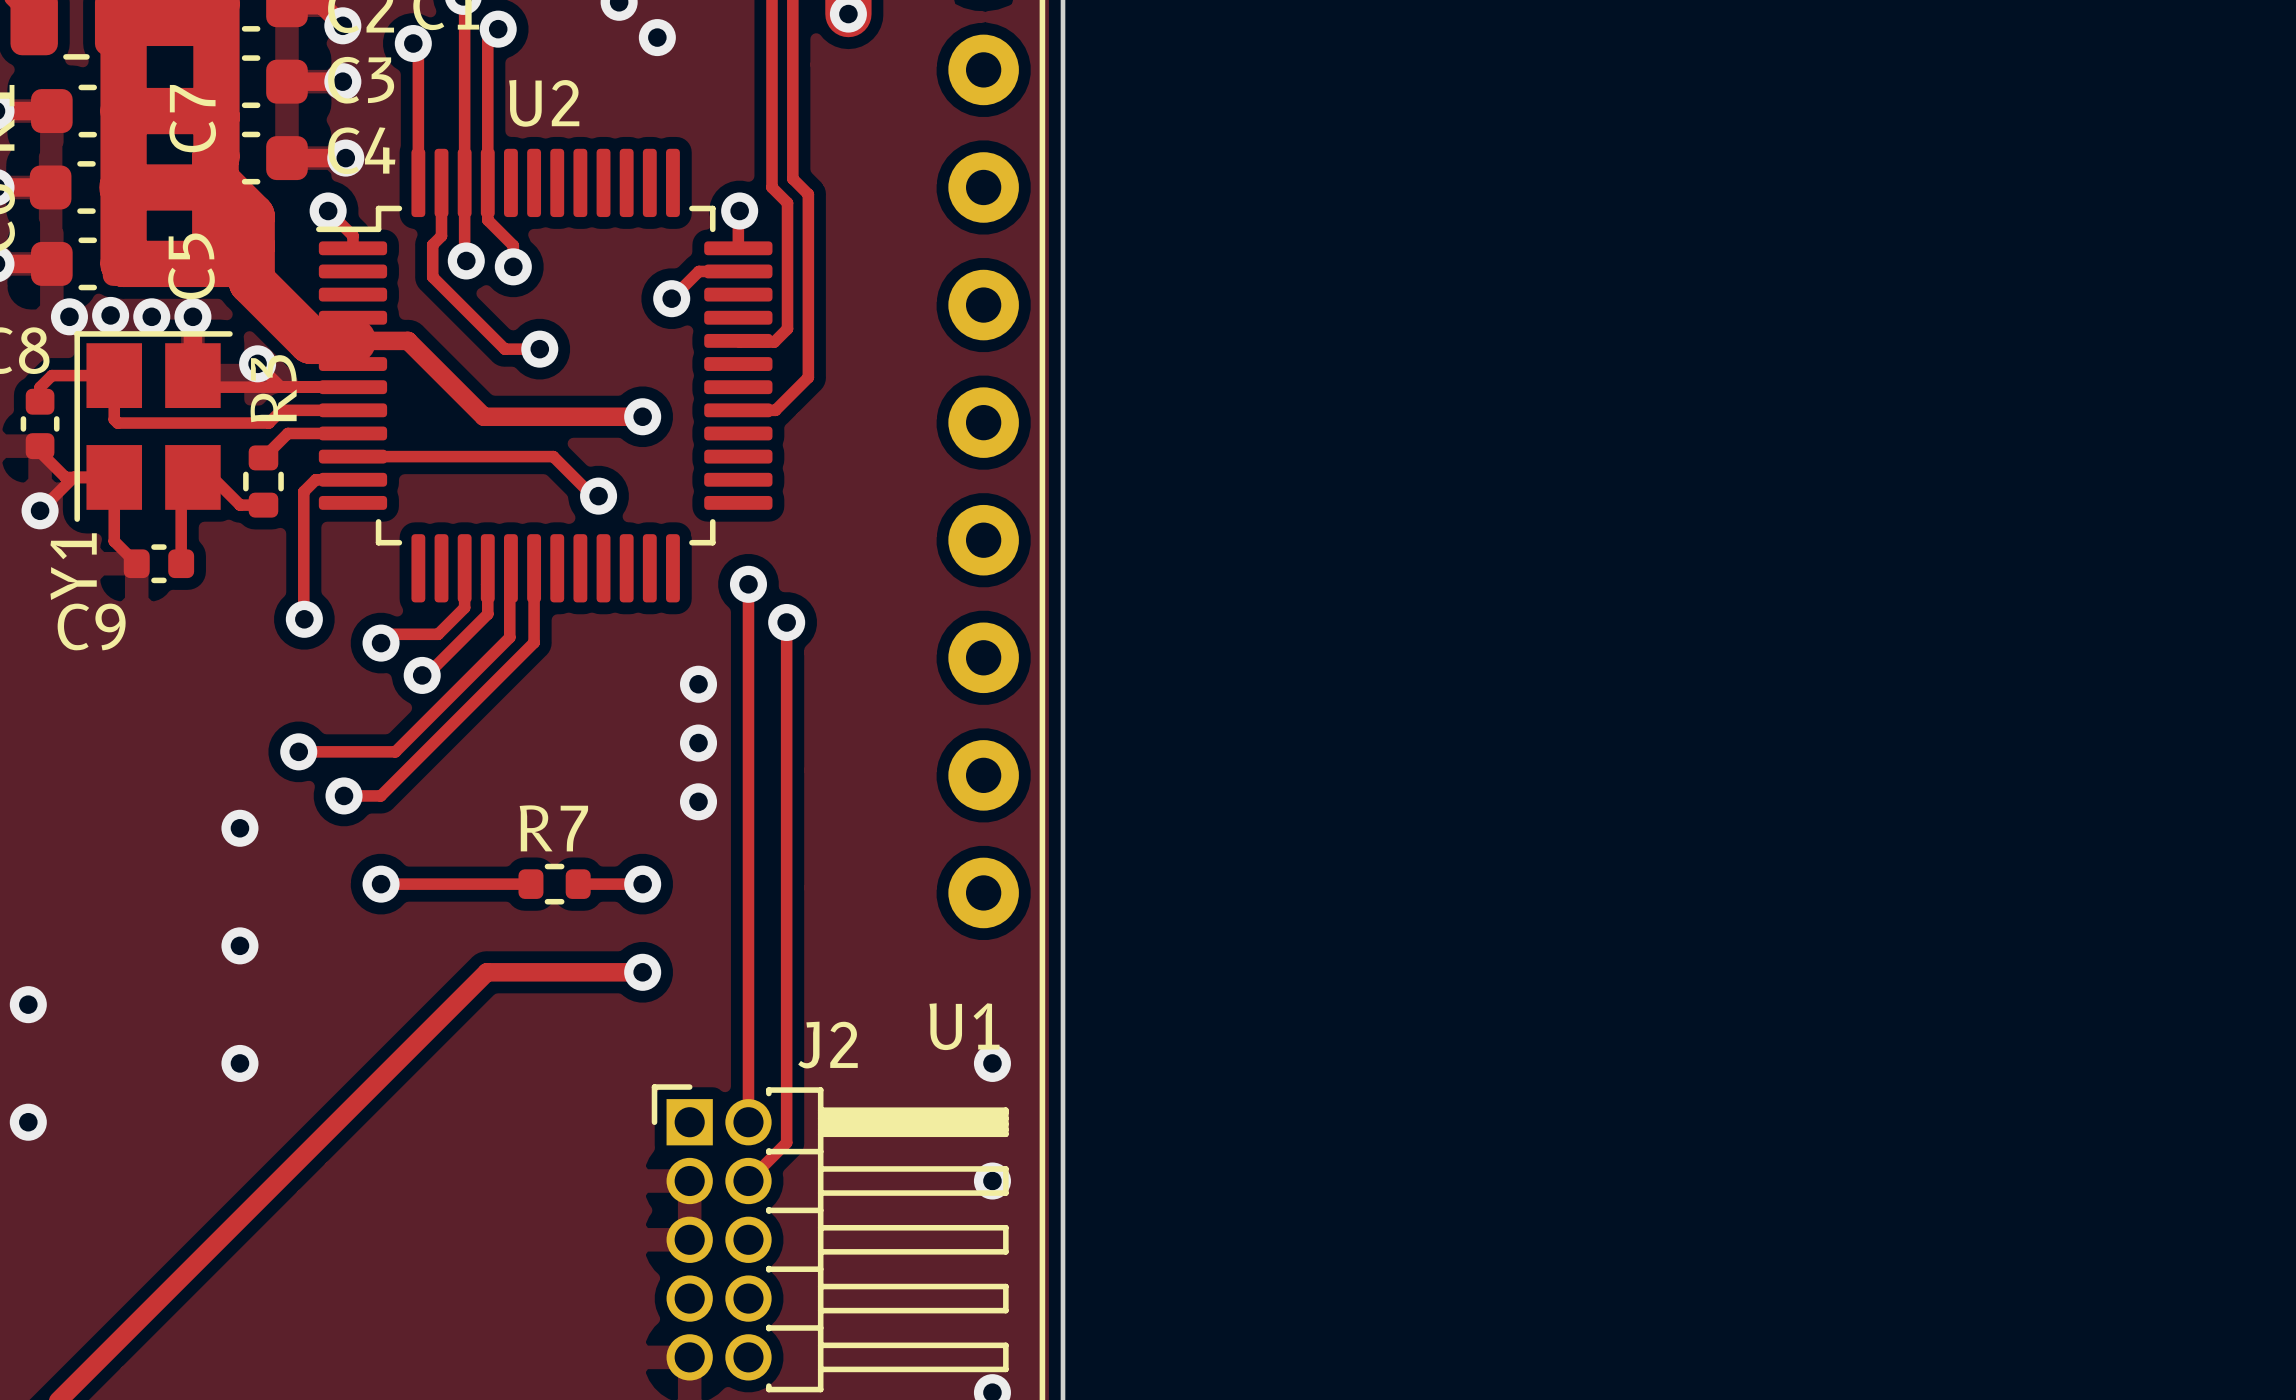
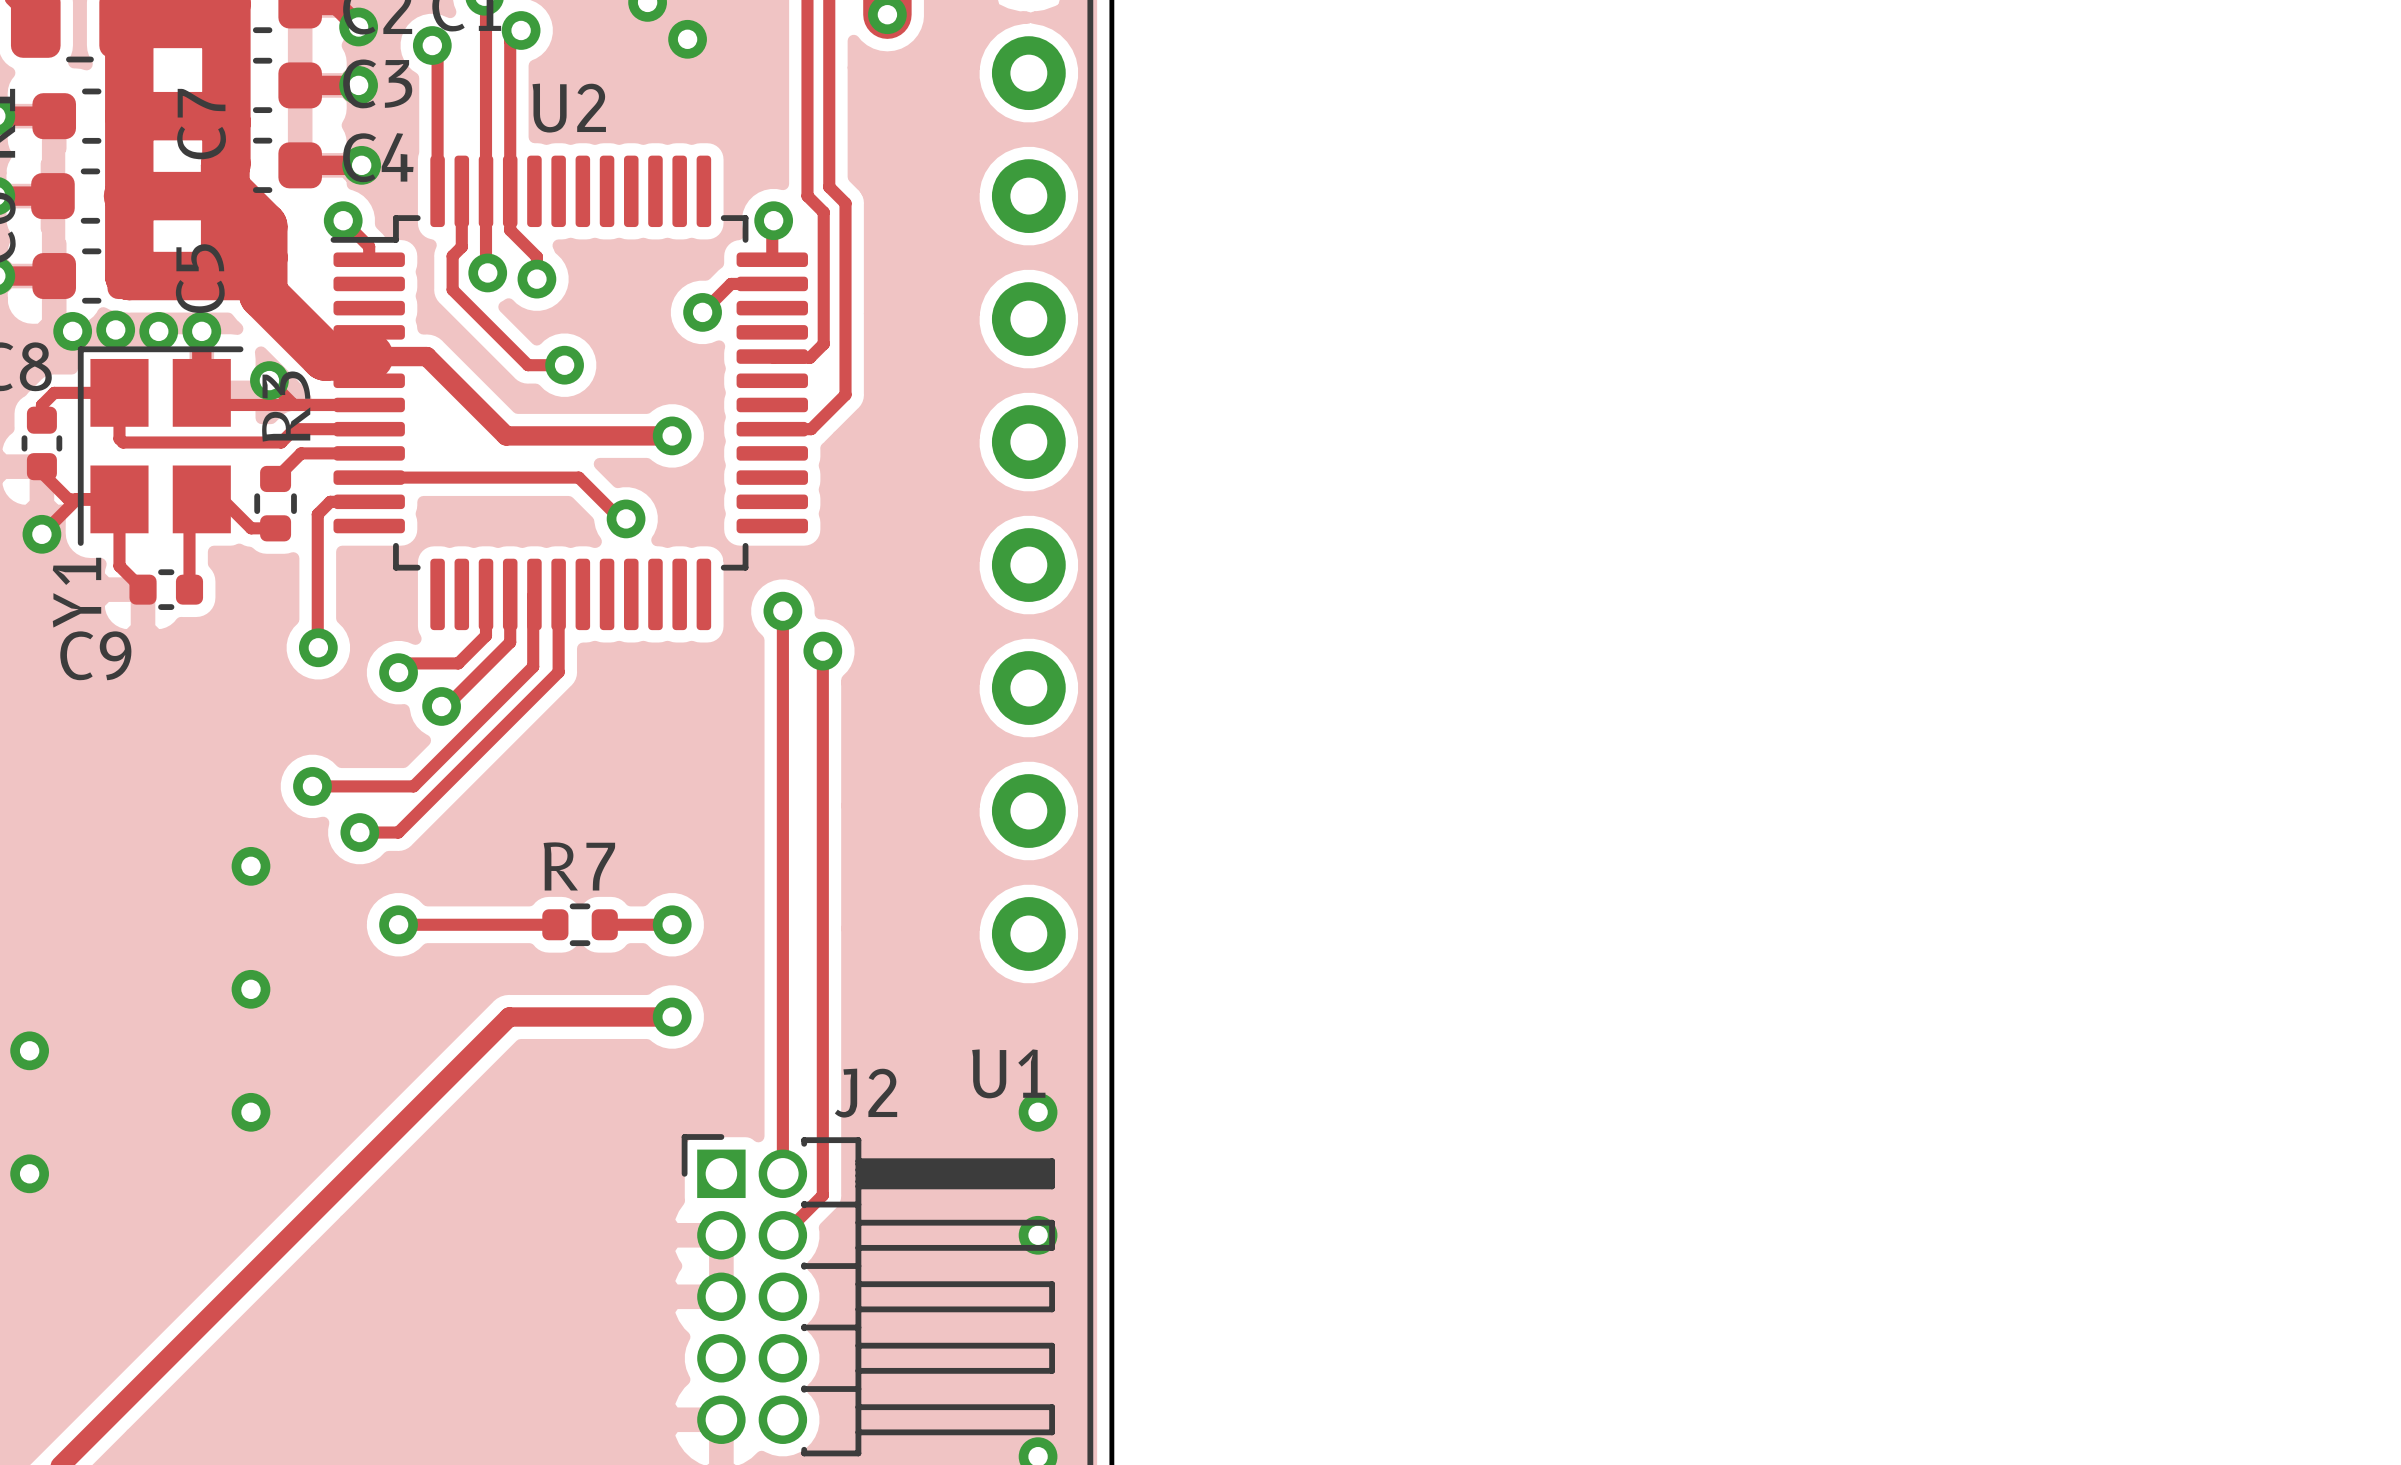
via: (698, 684) -> none
via: (698, 743) -> none
via: (698, 801) -> none

